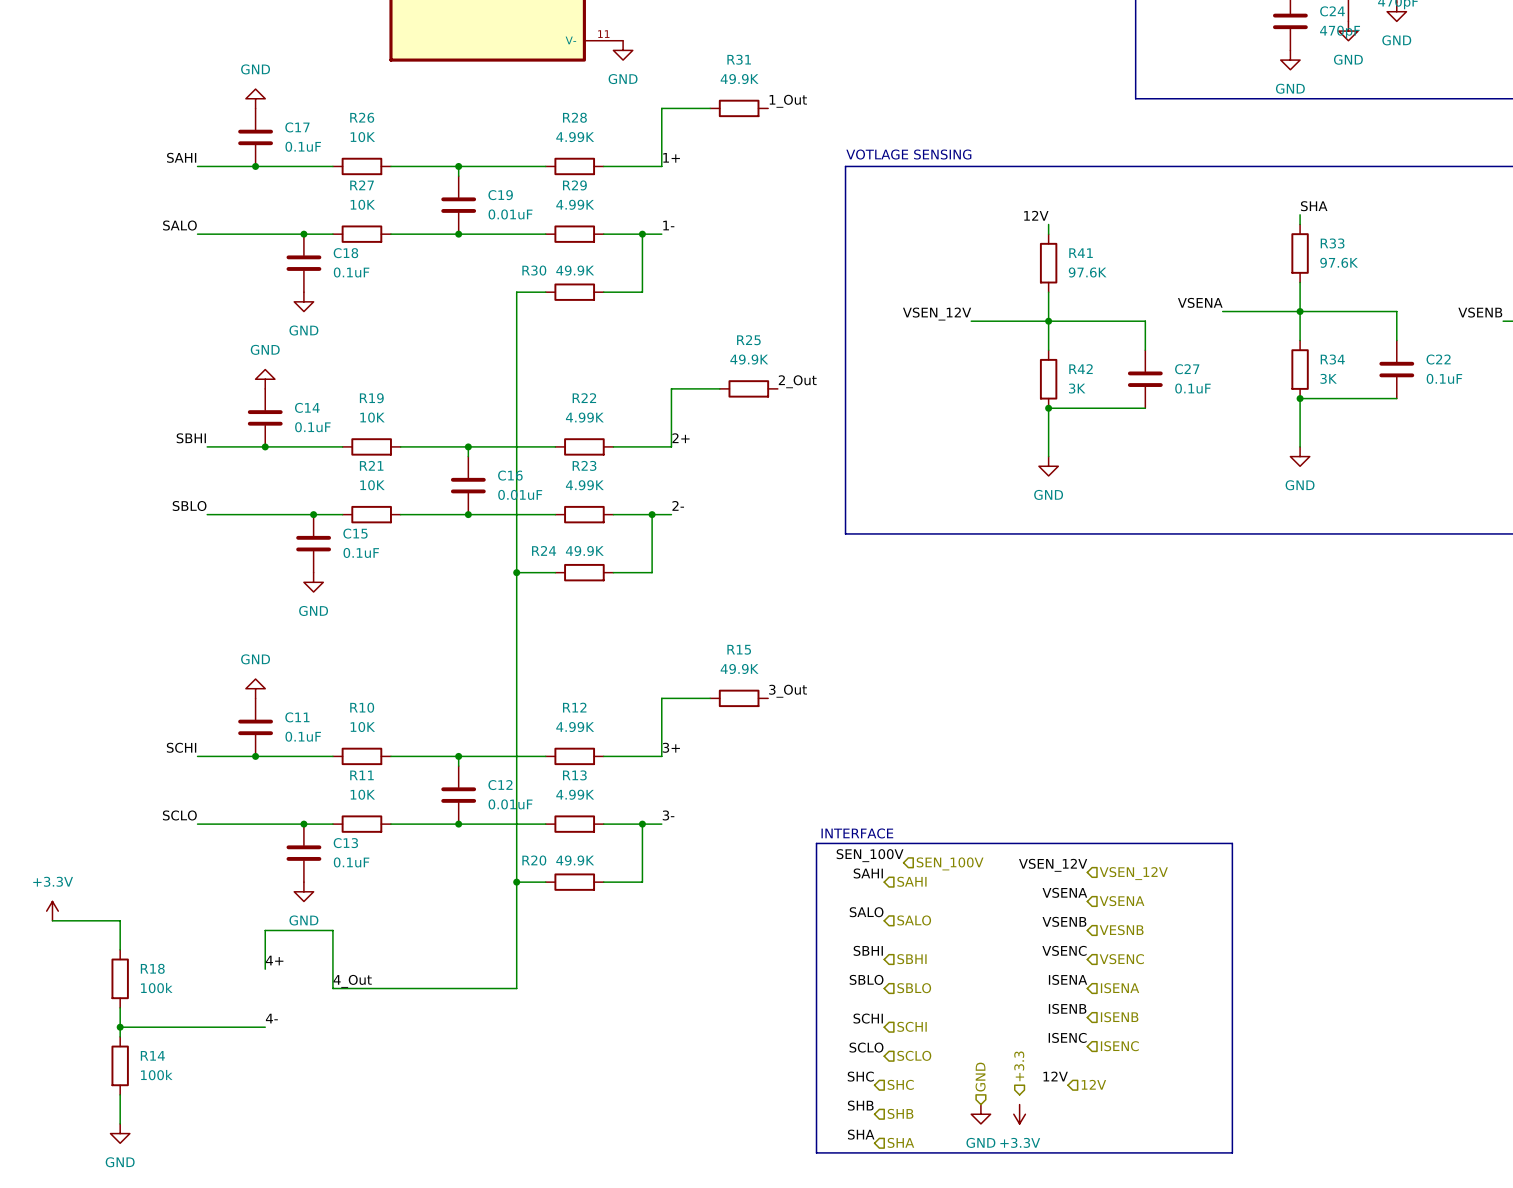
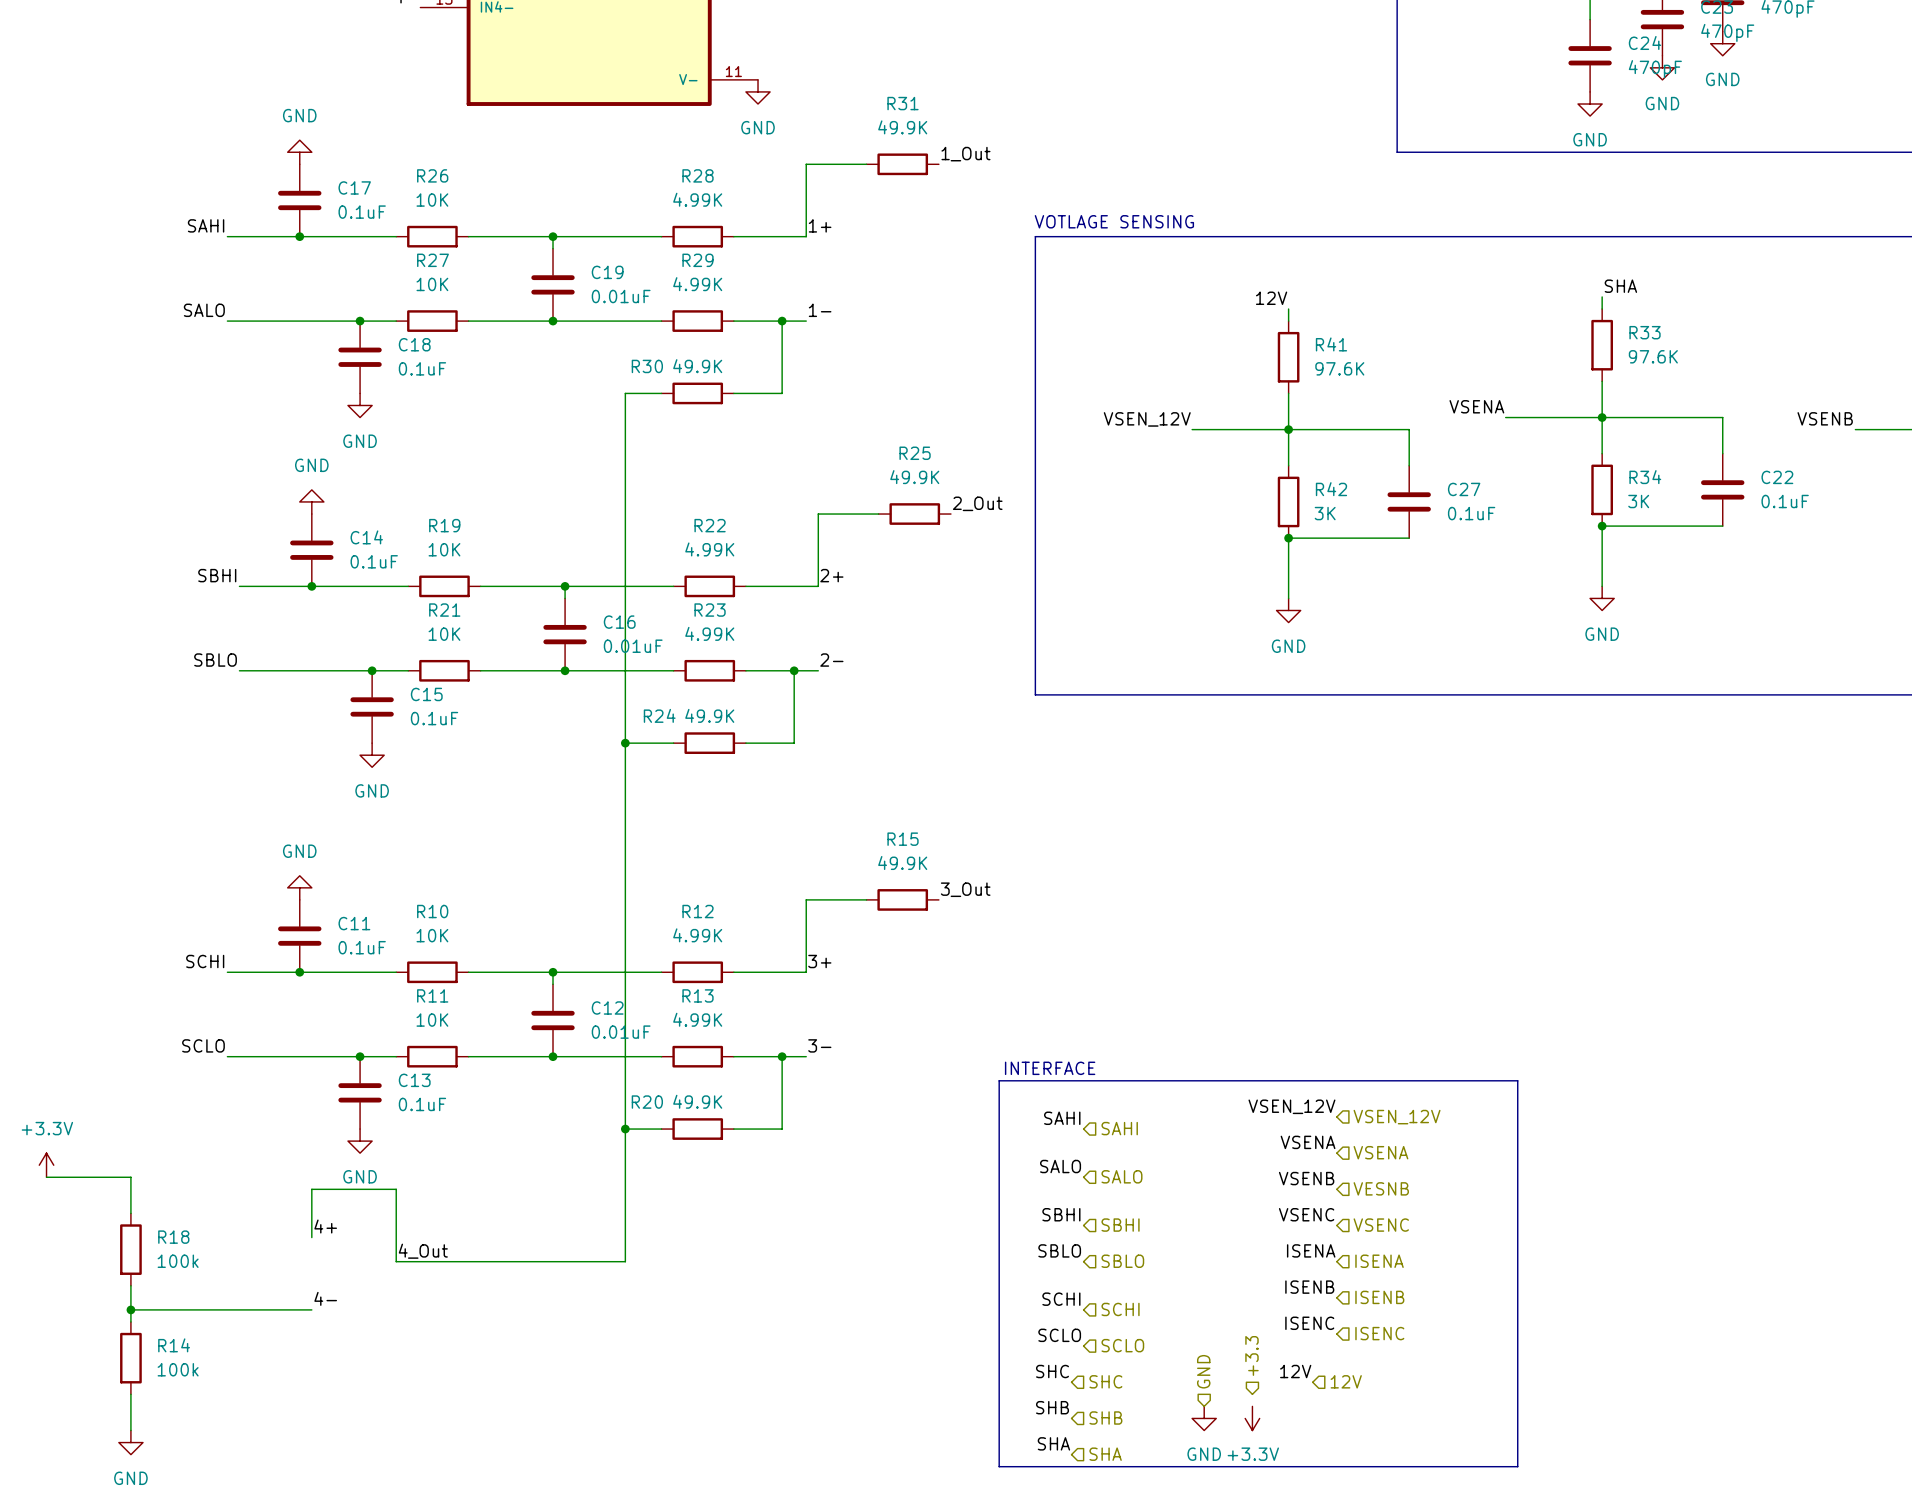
label: SEN_100V (870, 855) -> none
hierarchical label: SEN_100V (950, 863) -> none

